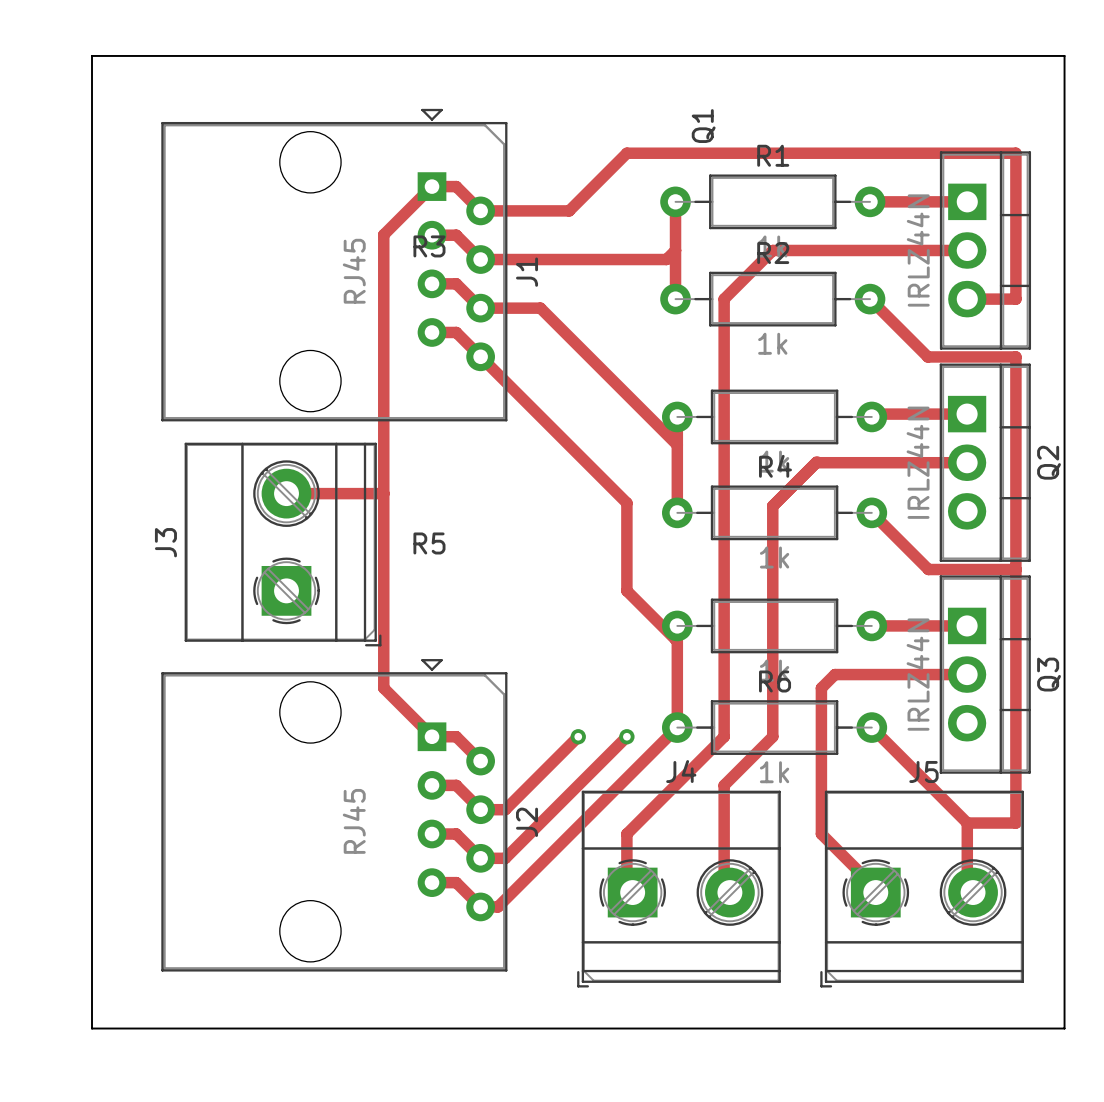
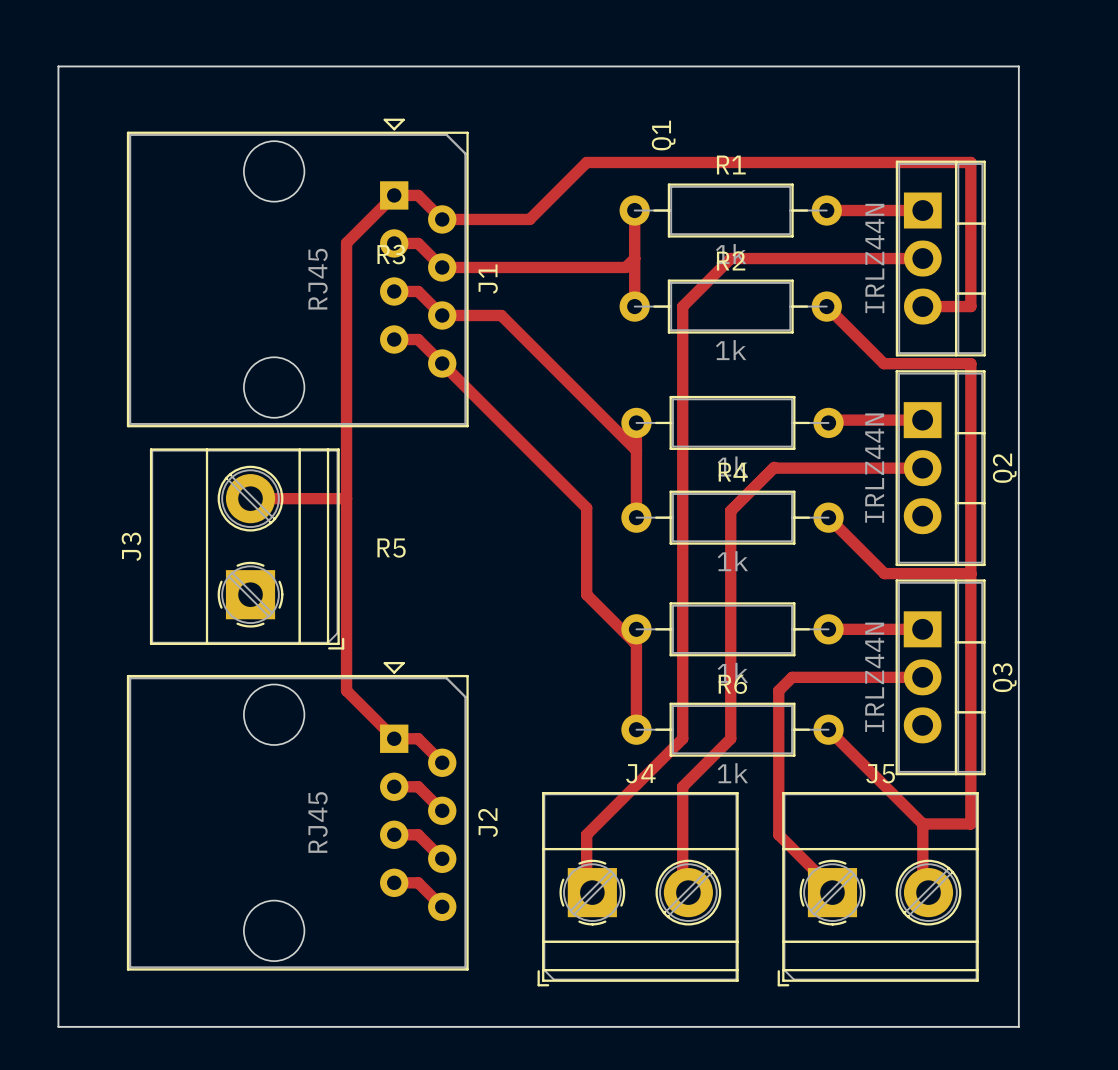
track: (677, 727) (497, 906) (480, 906) -> none
track: (578, 736) (505, 809) (480, 809) -> none
via: (578, 736) -> none
track: (626, 736) (505, 858) (480, 858) -> none
via: (626, 736) -> none

